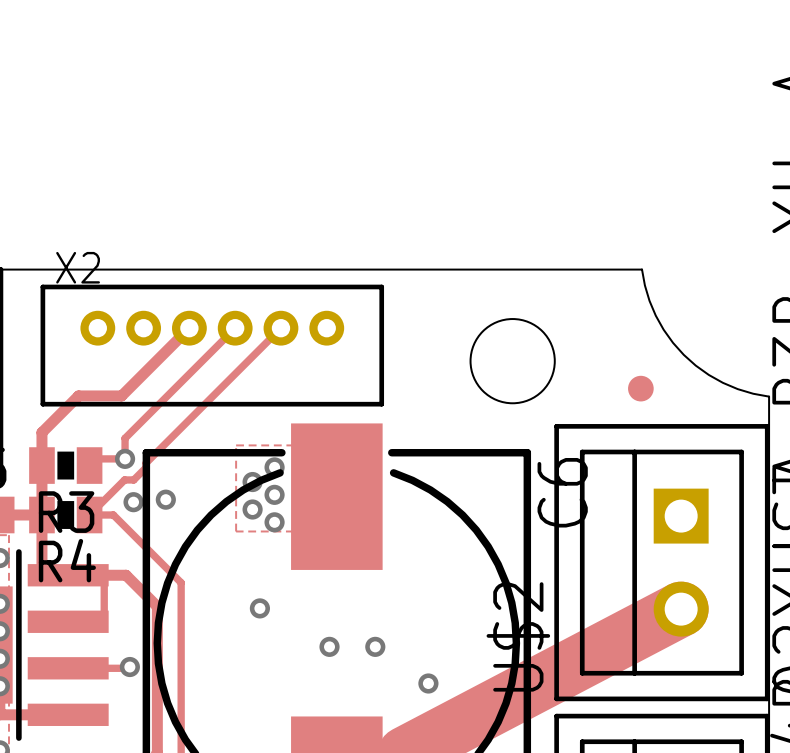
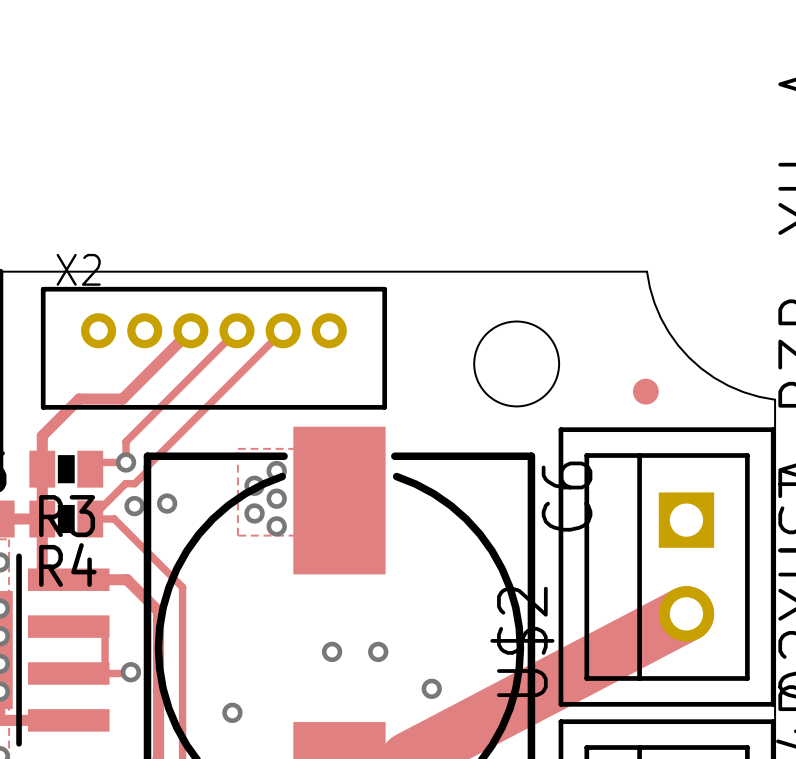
track: (100, 575) (104, 578) (104, 621) -> (105, 672) (105, 626)
via position: (259, 608) -> (232, 712)

